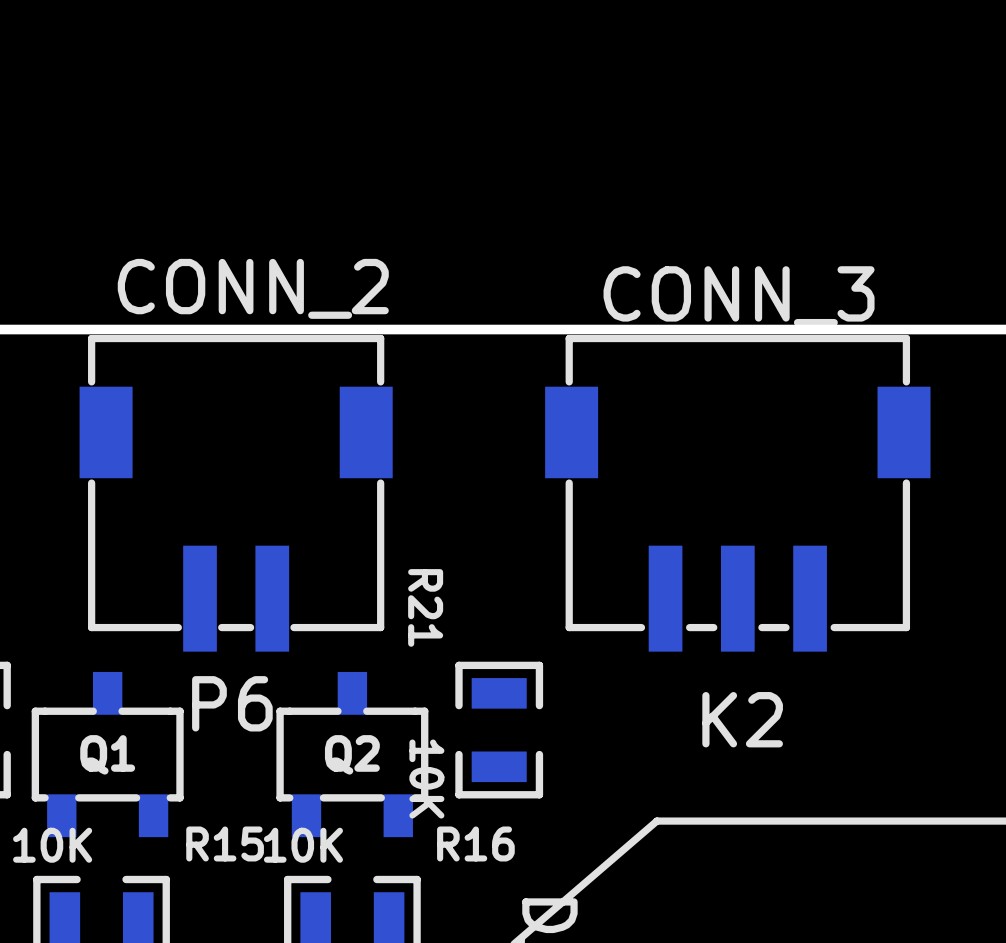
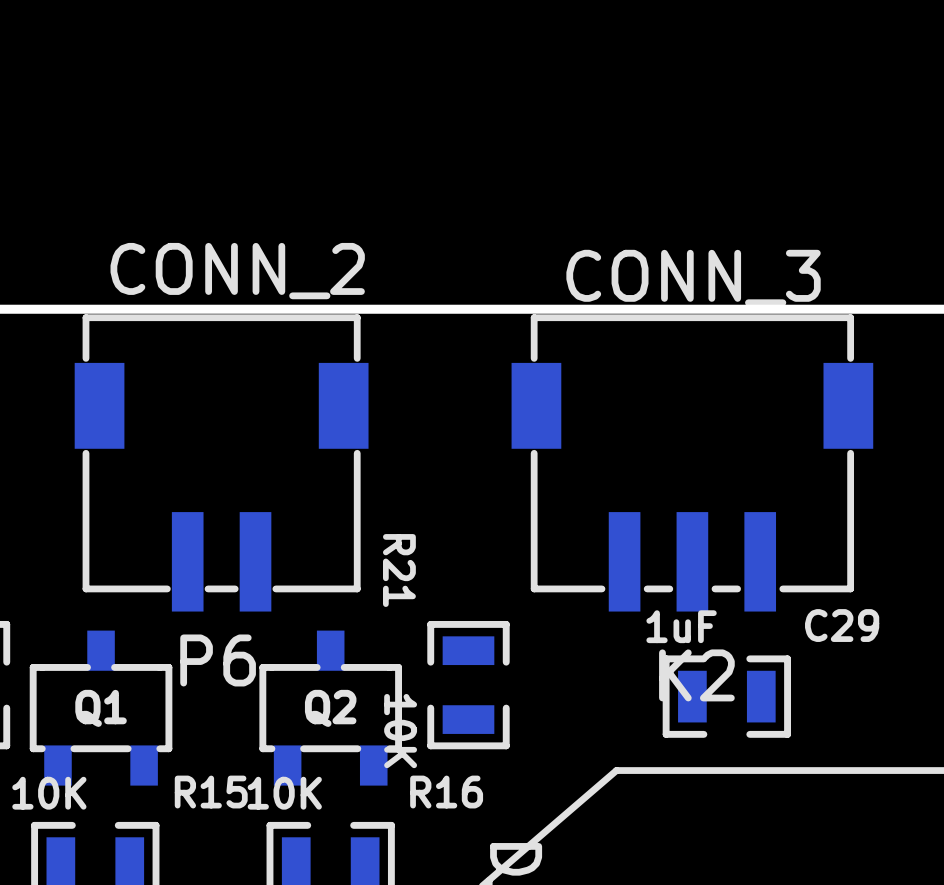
C29: none -> 1uF (726, 696)

